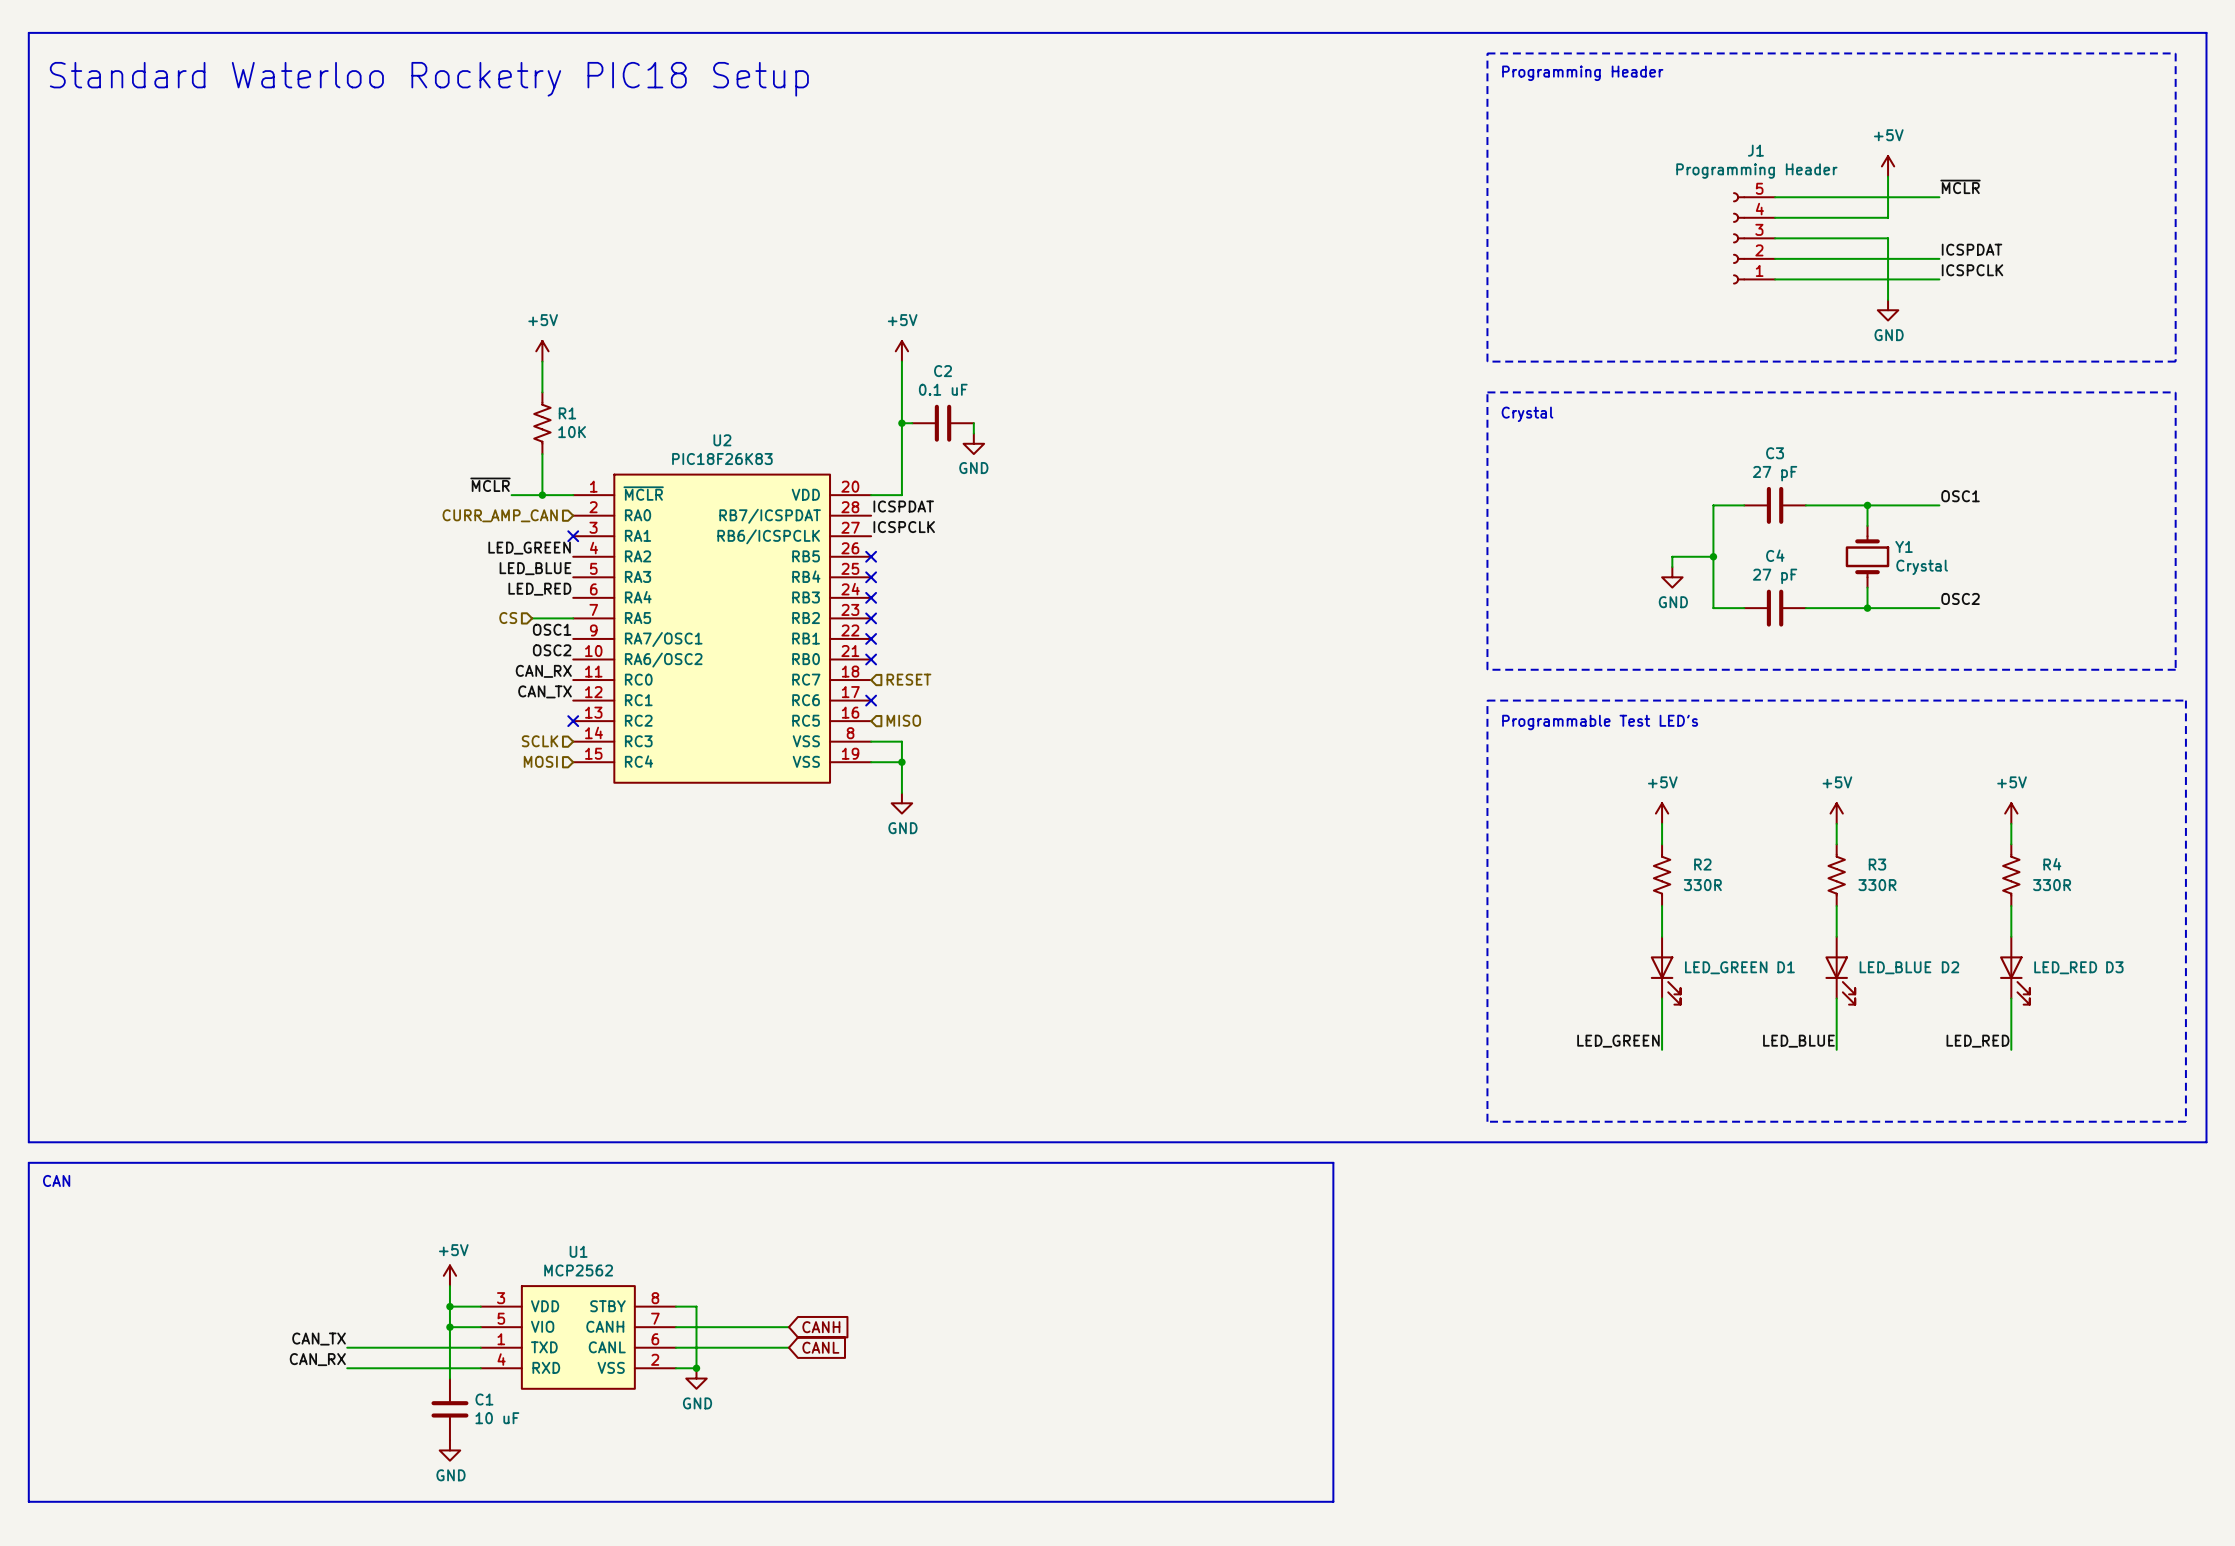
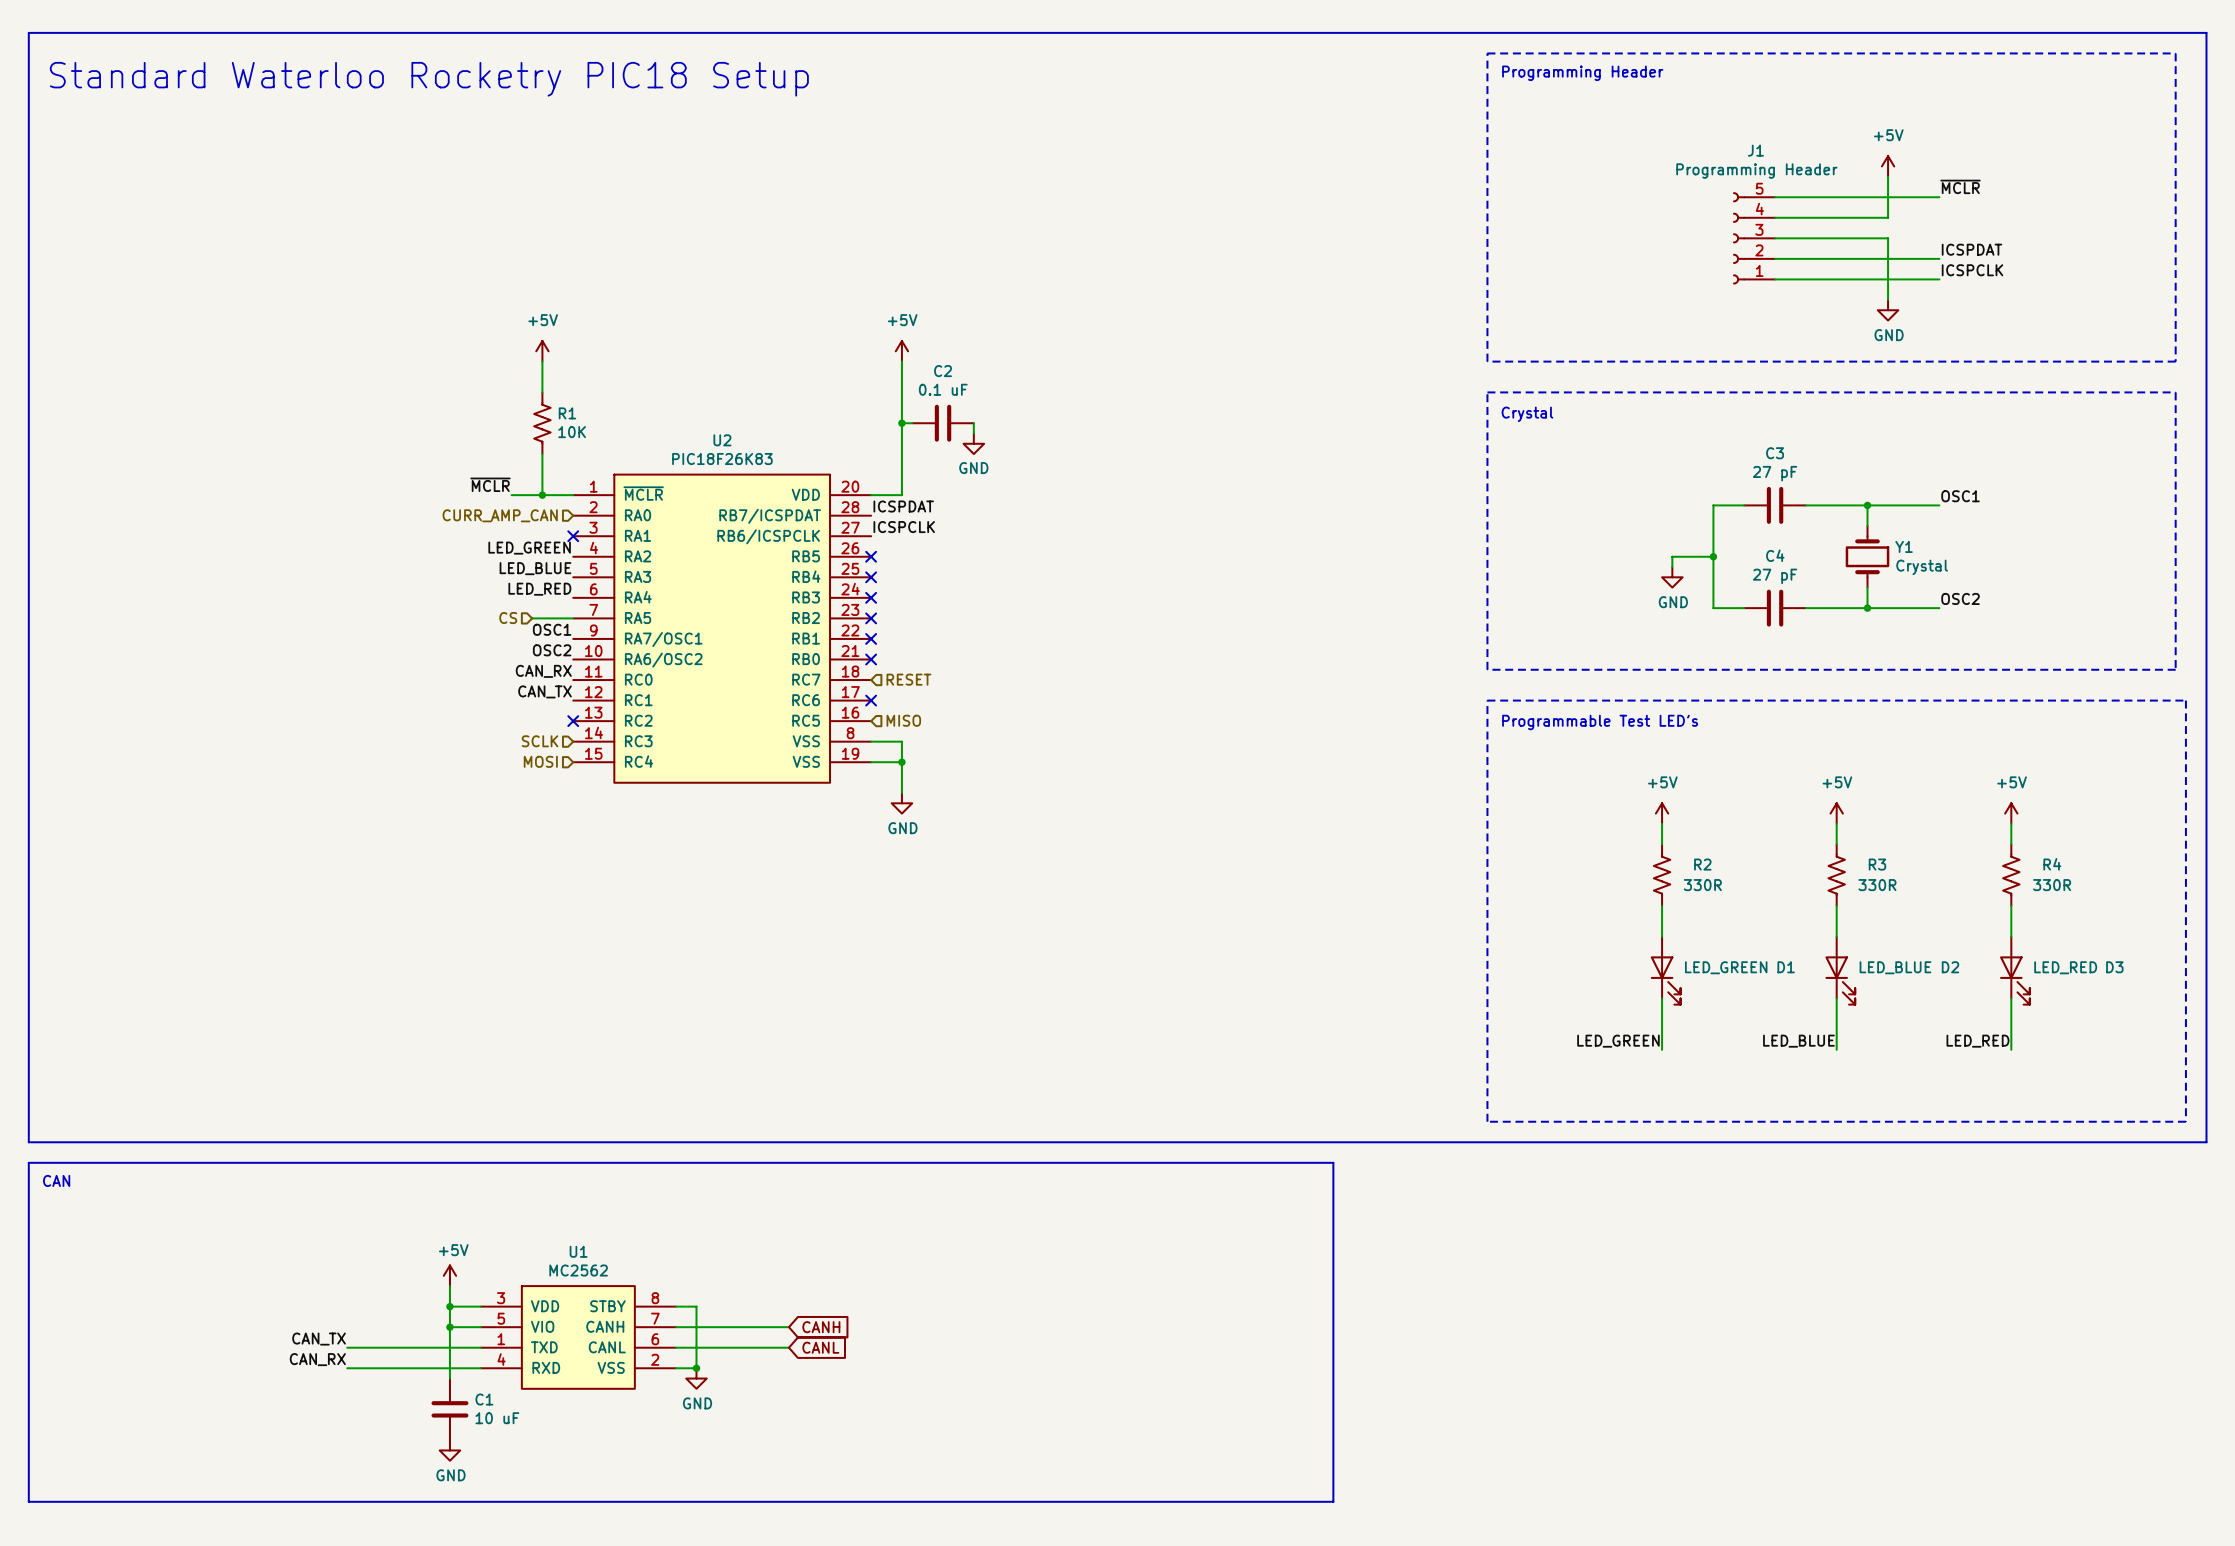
U1 value: MCP2562 (578, 1270) -> MC2562 (578, 1270)

